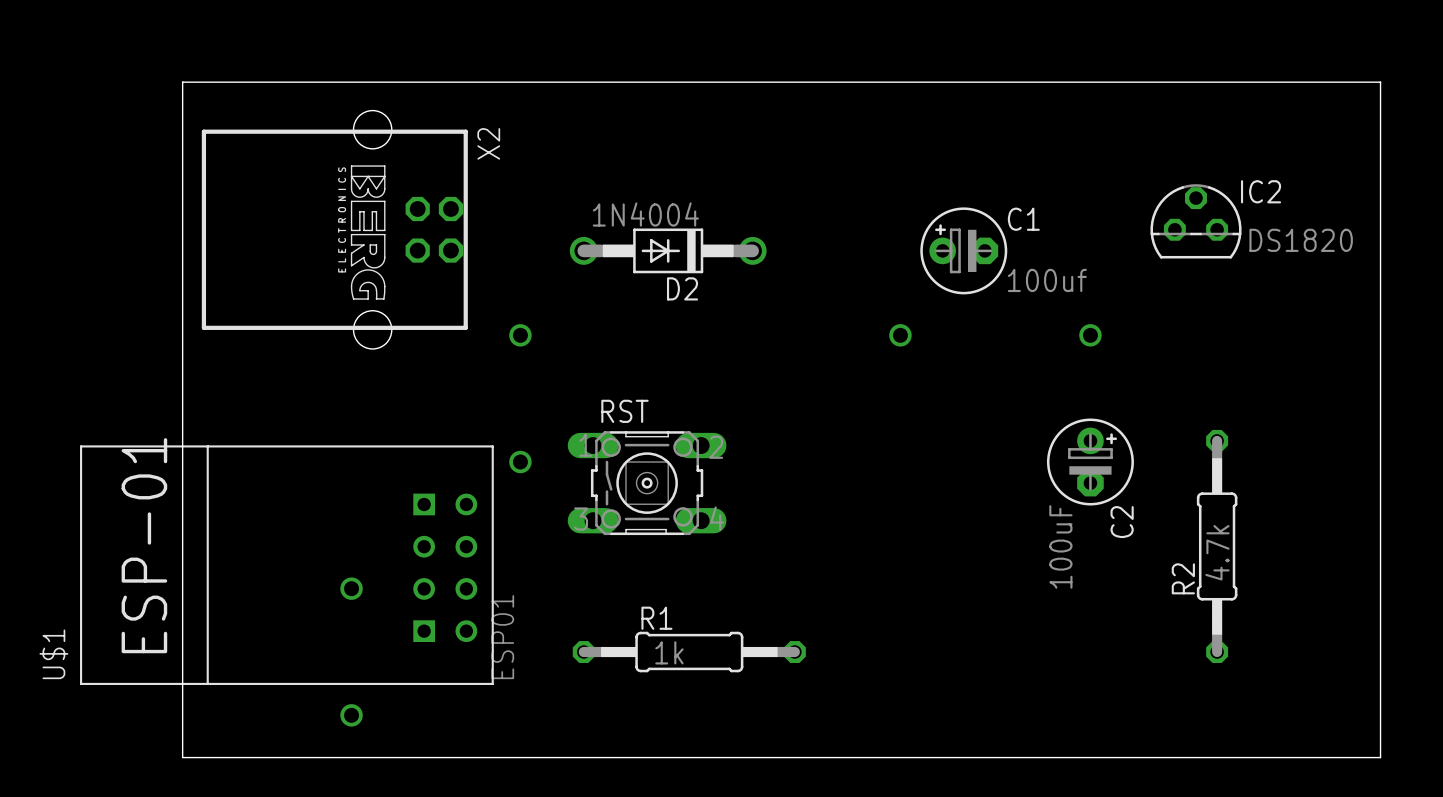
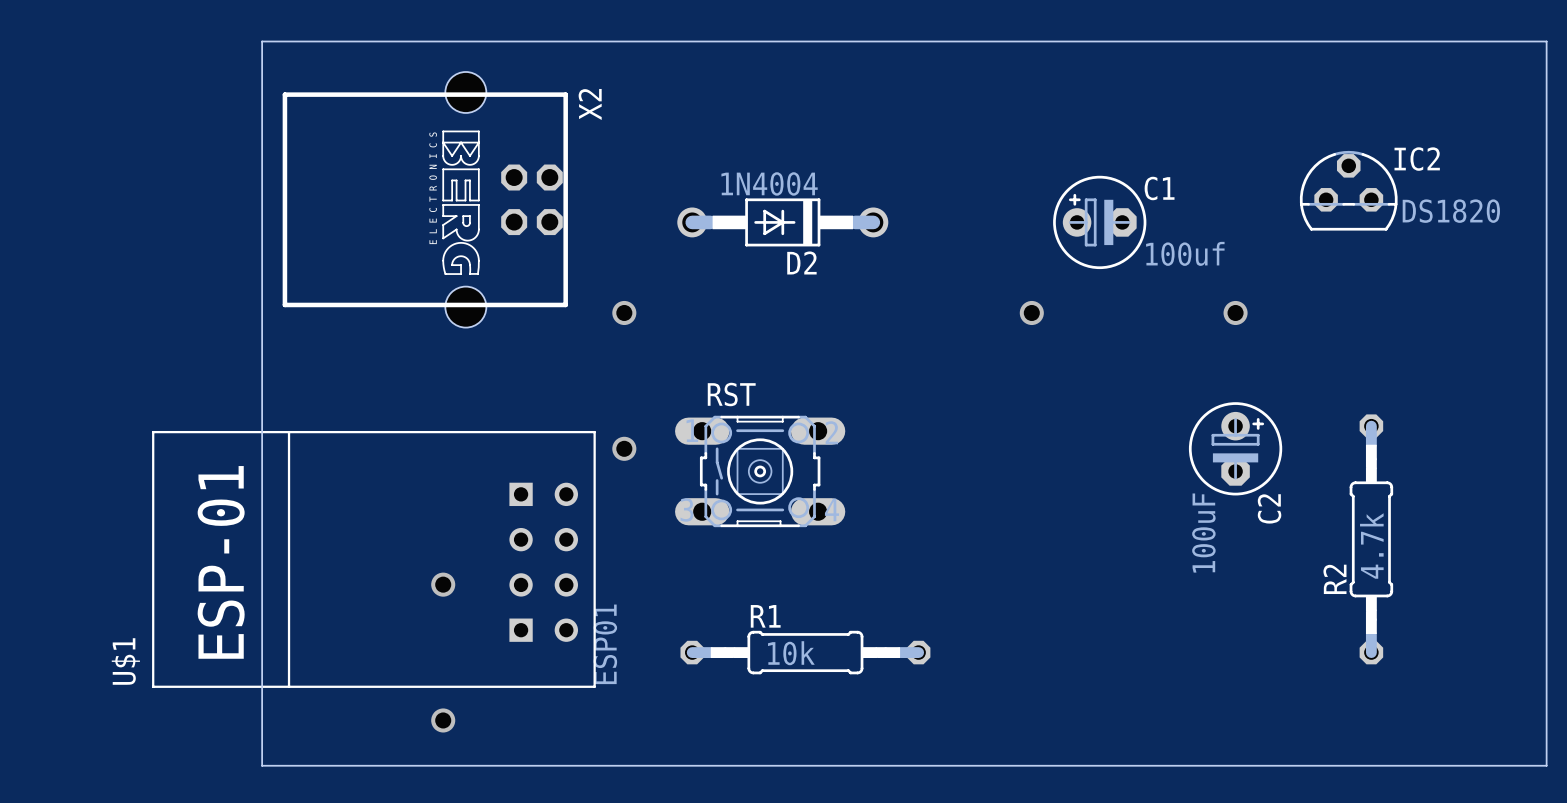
R1 value: 1k (669, 652) -> 10k (791, 653)

